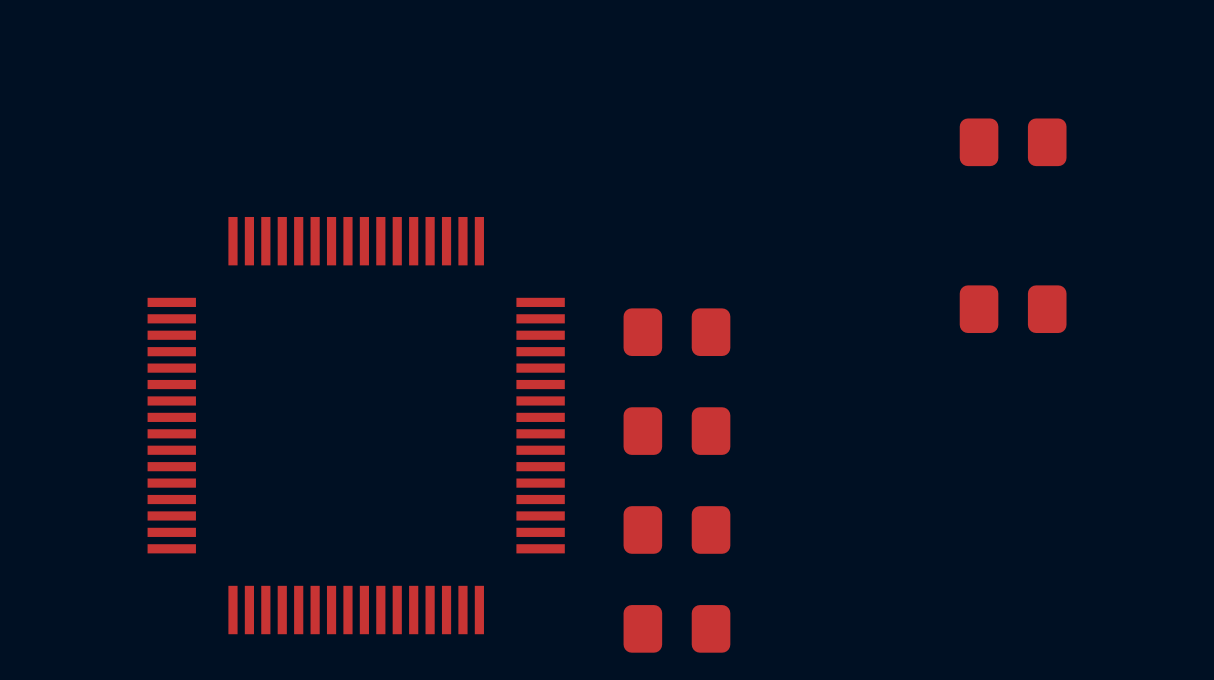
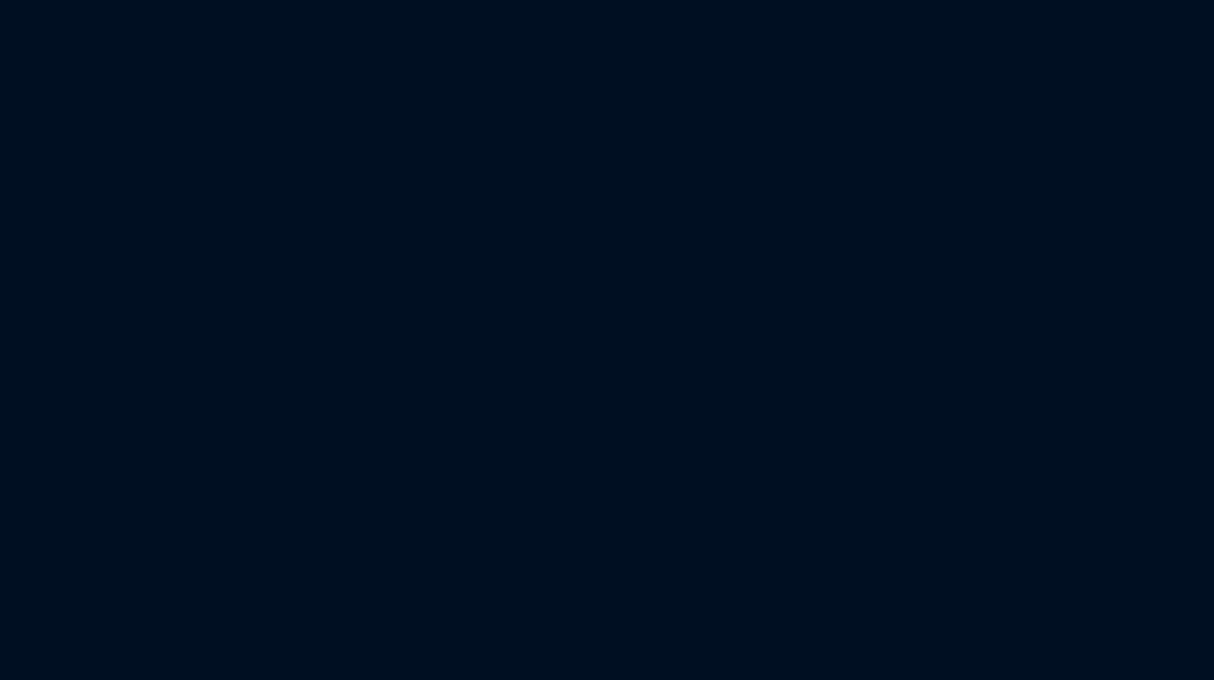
part: (1013, 142) -> none
part: (1013, 309) -> none
part: (676, 332) -> none
part: (356, 425) -> none
part: (676, 431) -> none
part: (676, 529) -> none
part: (676, 628) -> none

